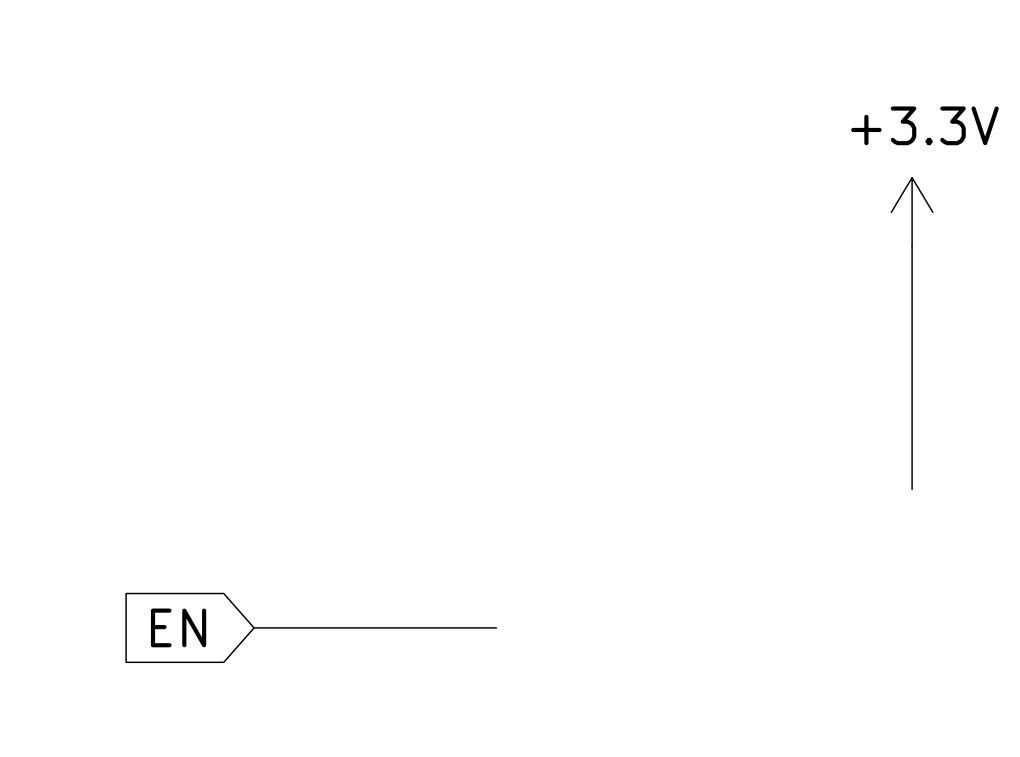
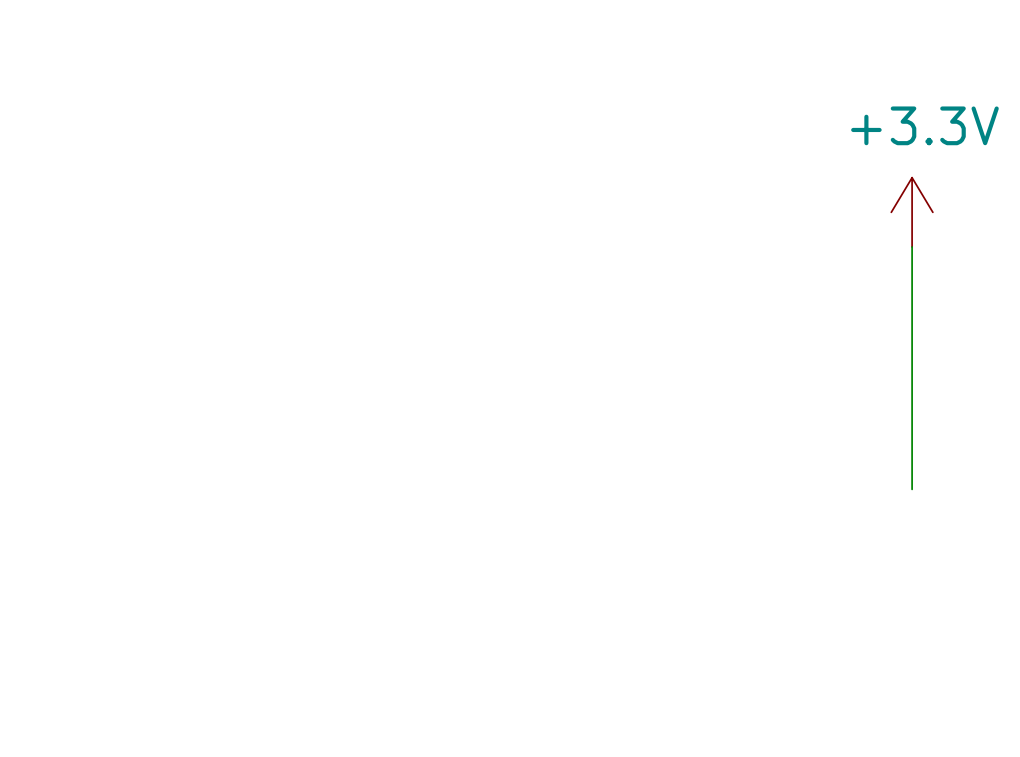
global label: EN (178, 627) -> none
wire: (254, 627) (496, 627) -> none

